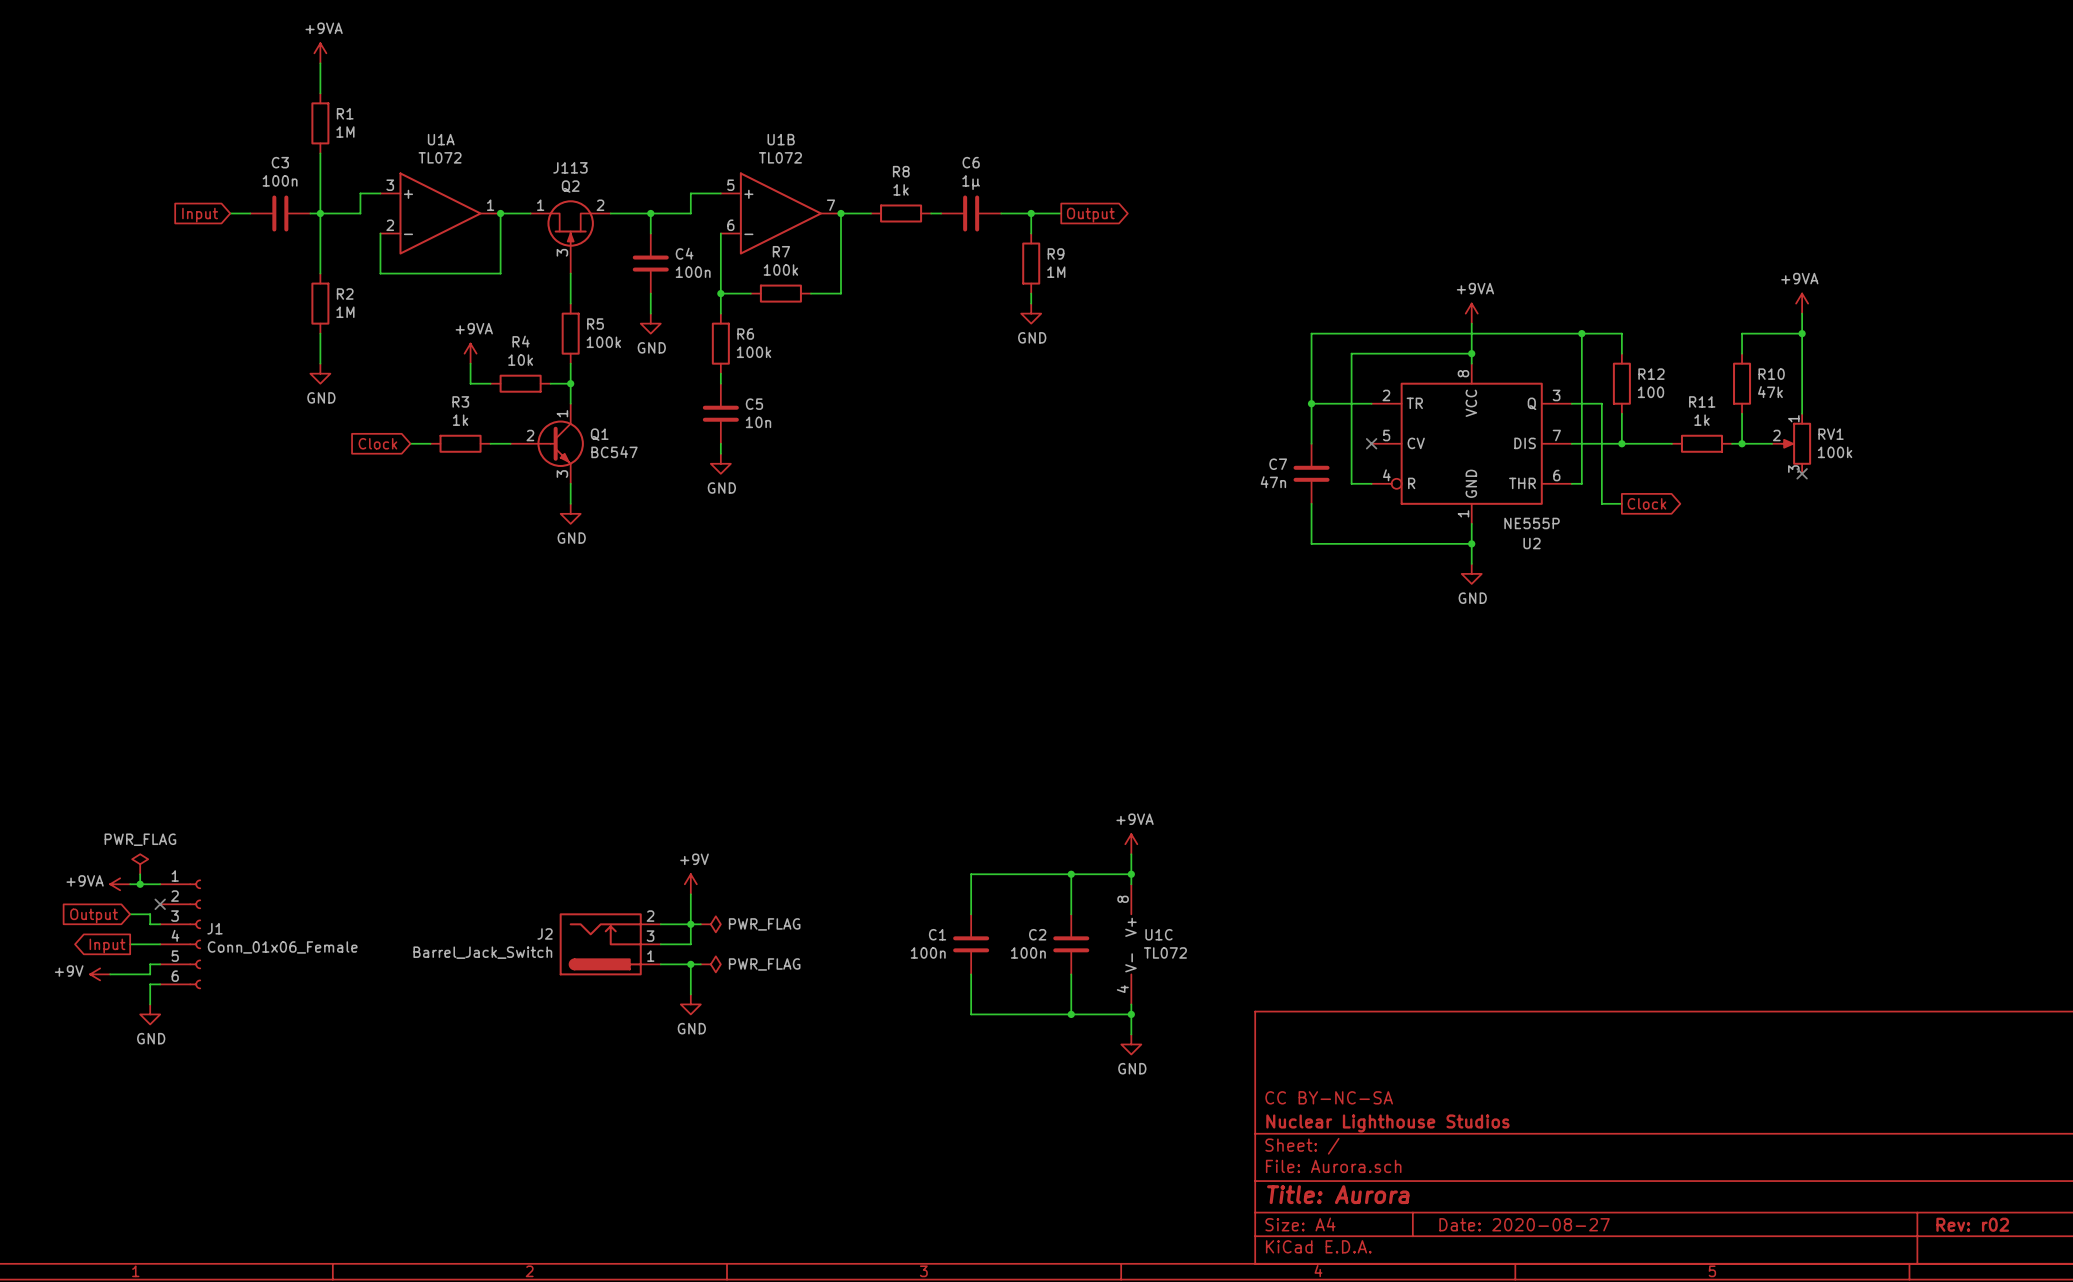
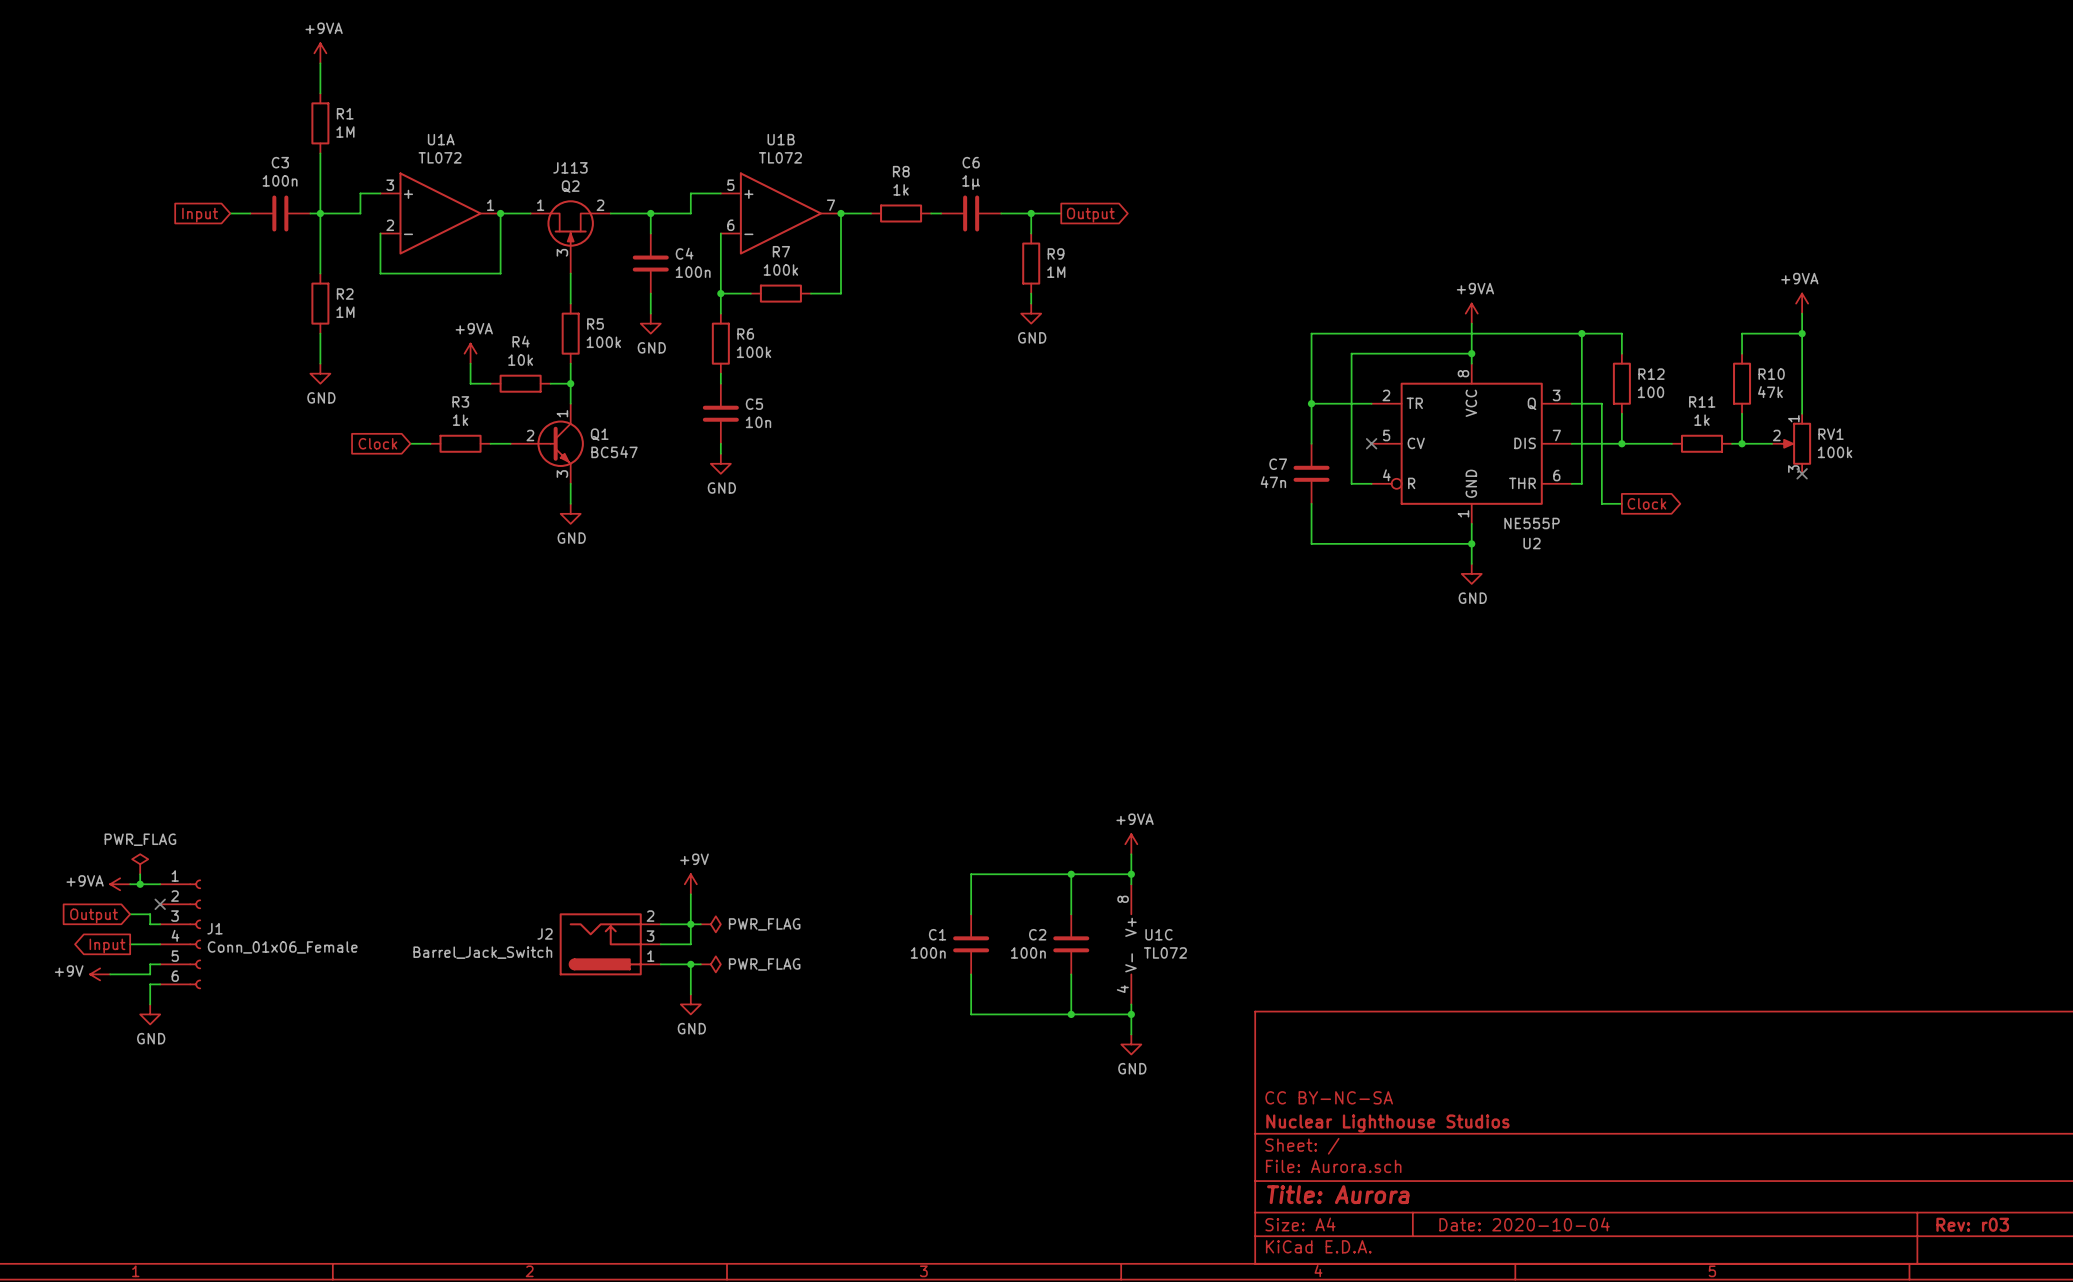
title block: Date: 2020-08-27 (1524, 1224) -> Date: 2020-10-04 (1524, 1224)
title block: Rev: r02 (1972, 1224) -> Rev: r03 (1972, 1224)

